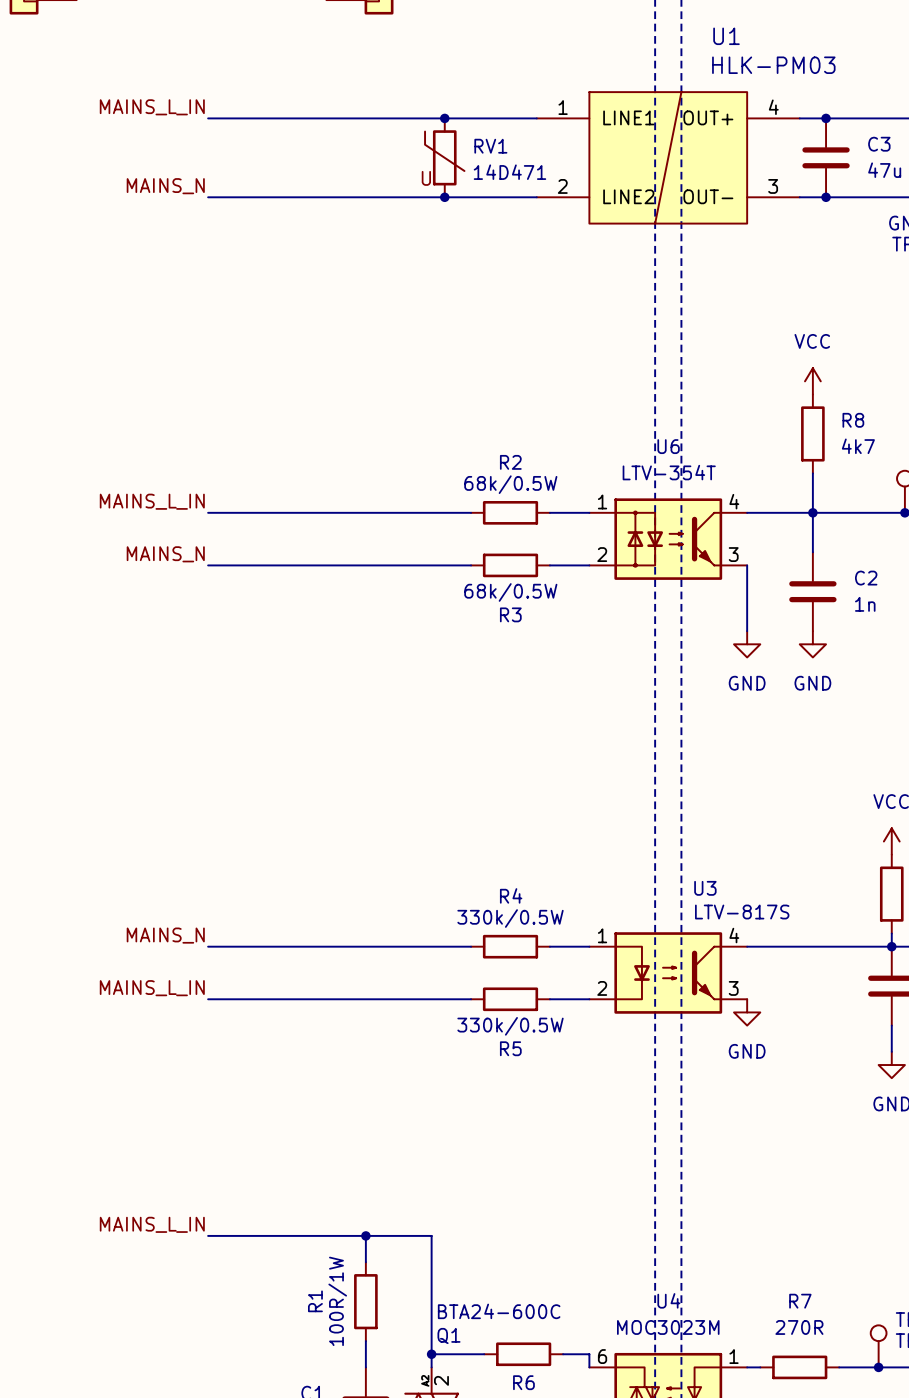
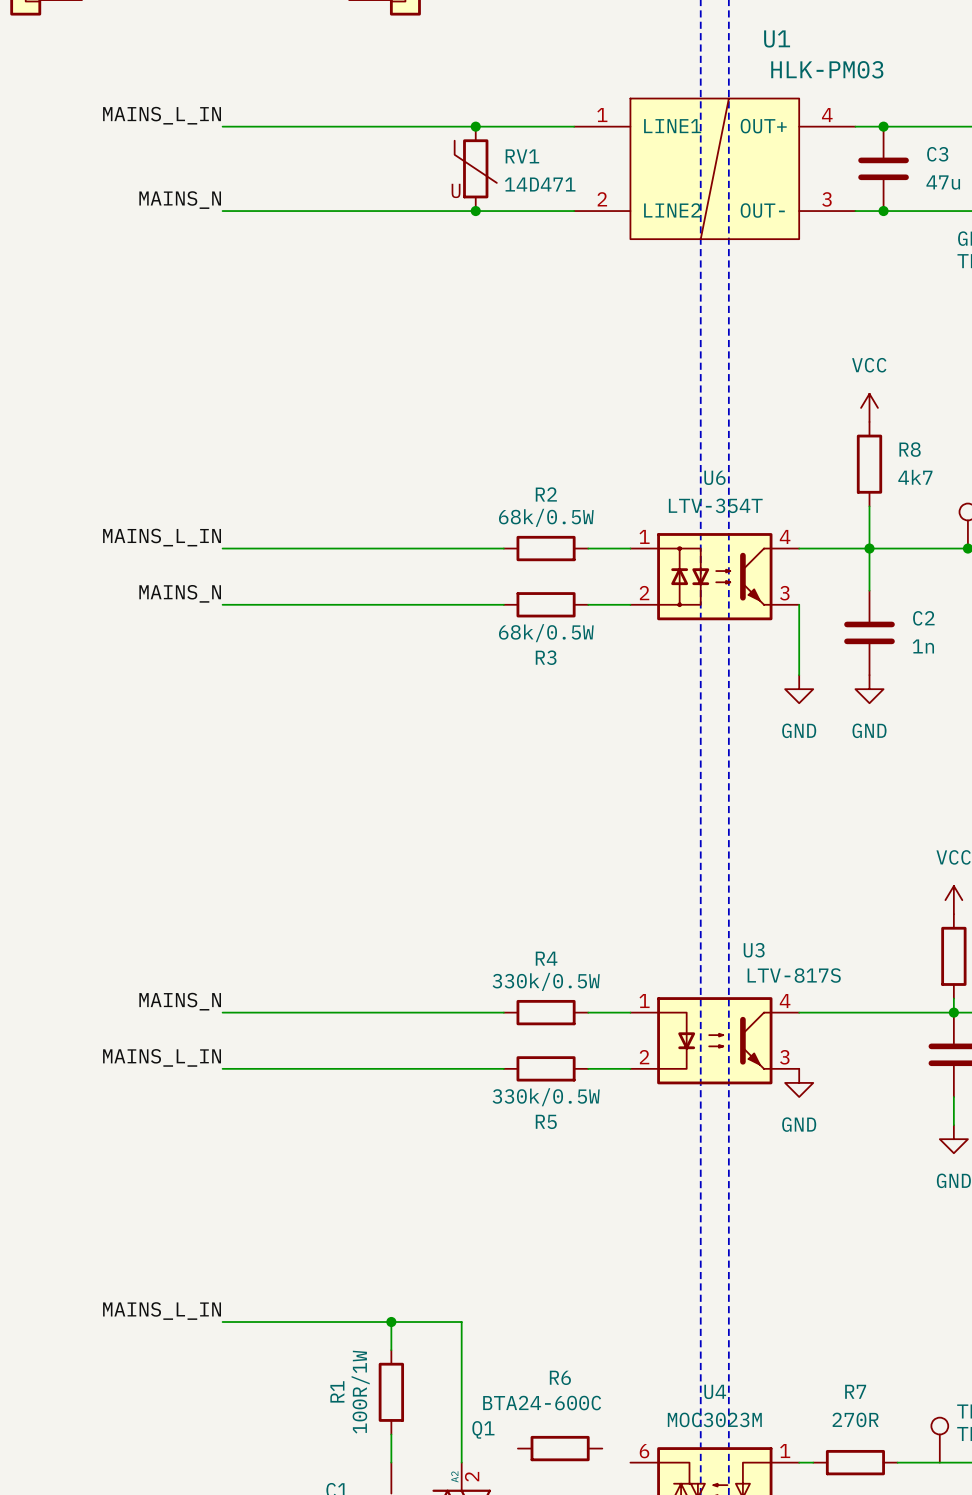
wire: (431, 1354) (484, 1354) -> none
junction: (431, 1354) -> none
wire: (563, 1354) (589, 1354) (589, 1367) -> none
junction: (878, 1367) -> none
R6 name position: R6 (523, 1382) -> R6 (560, 1377)

